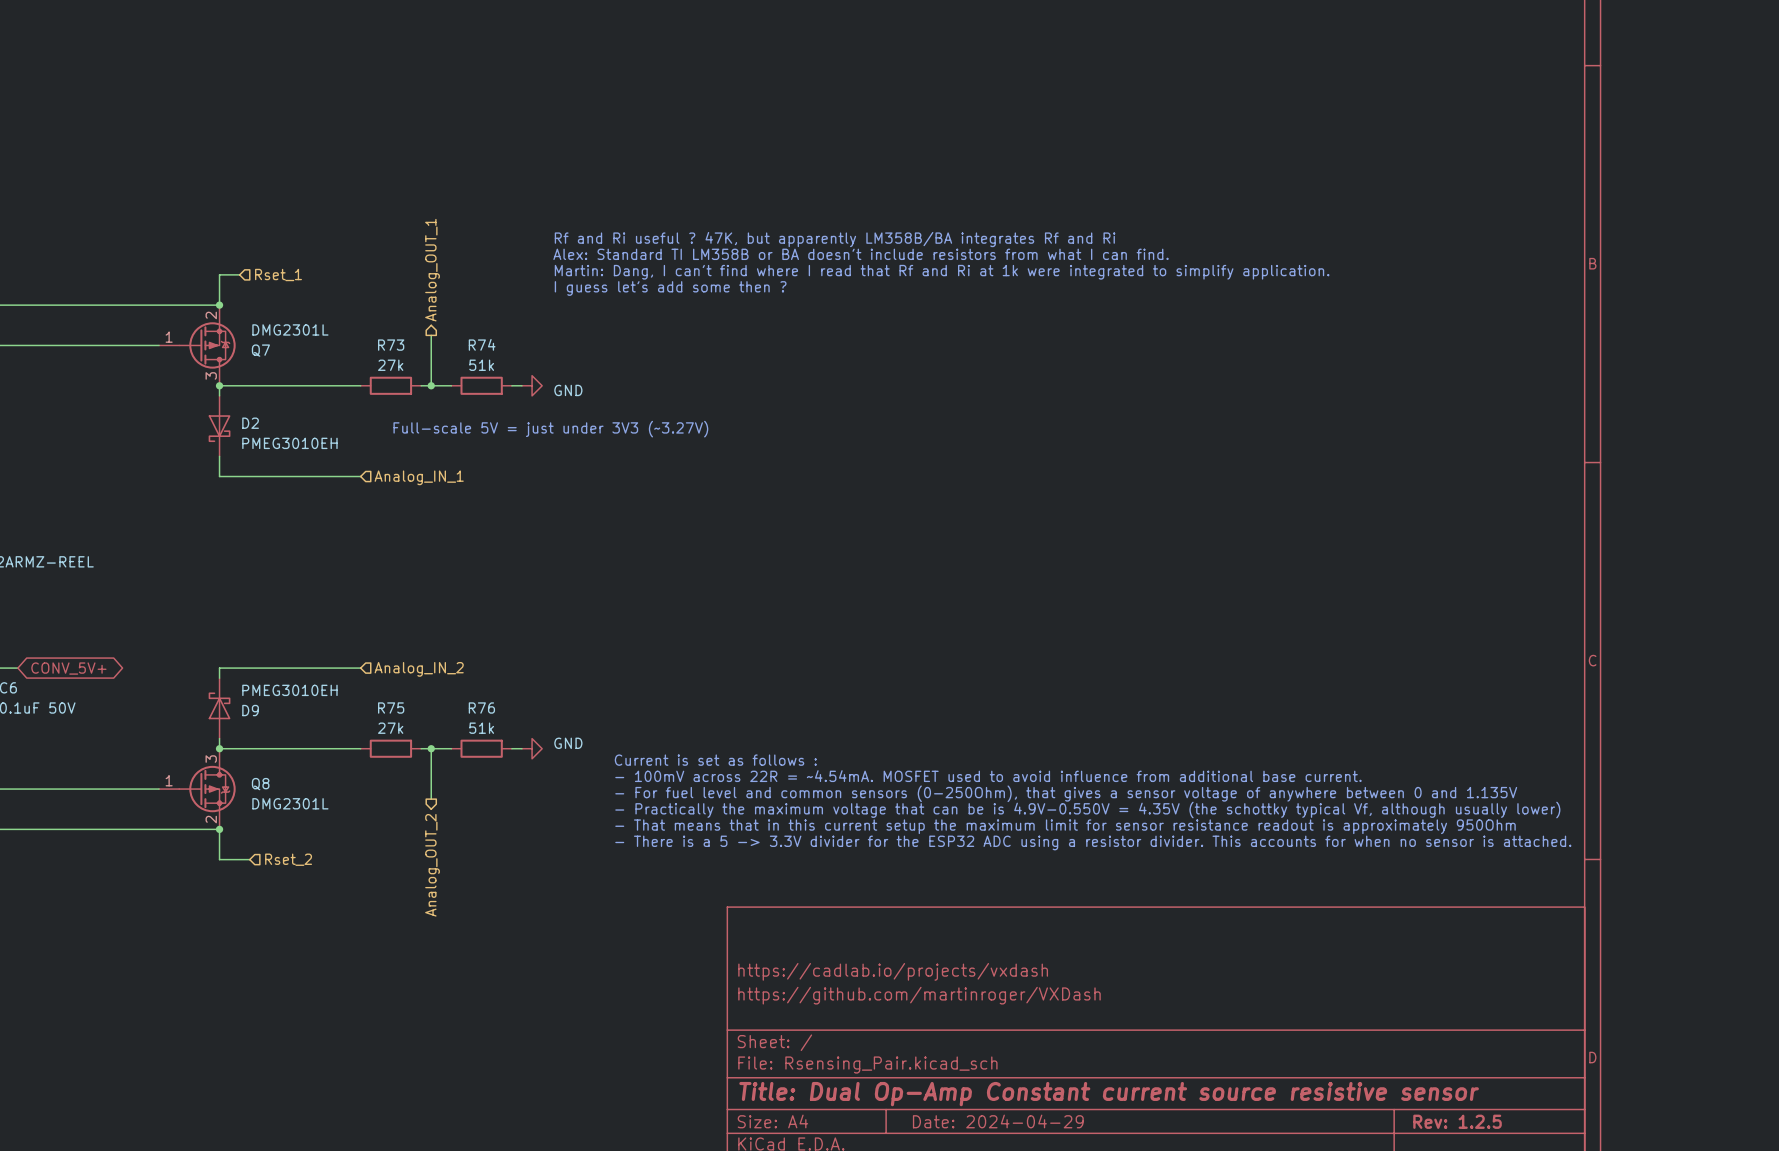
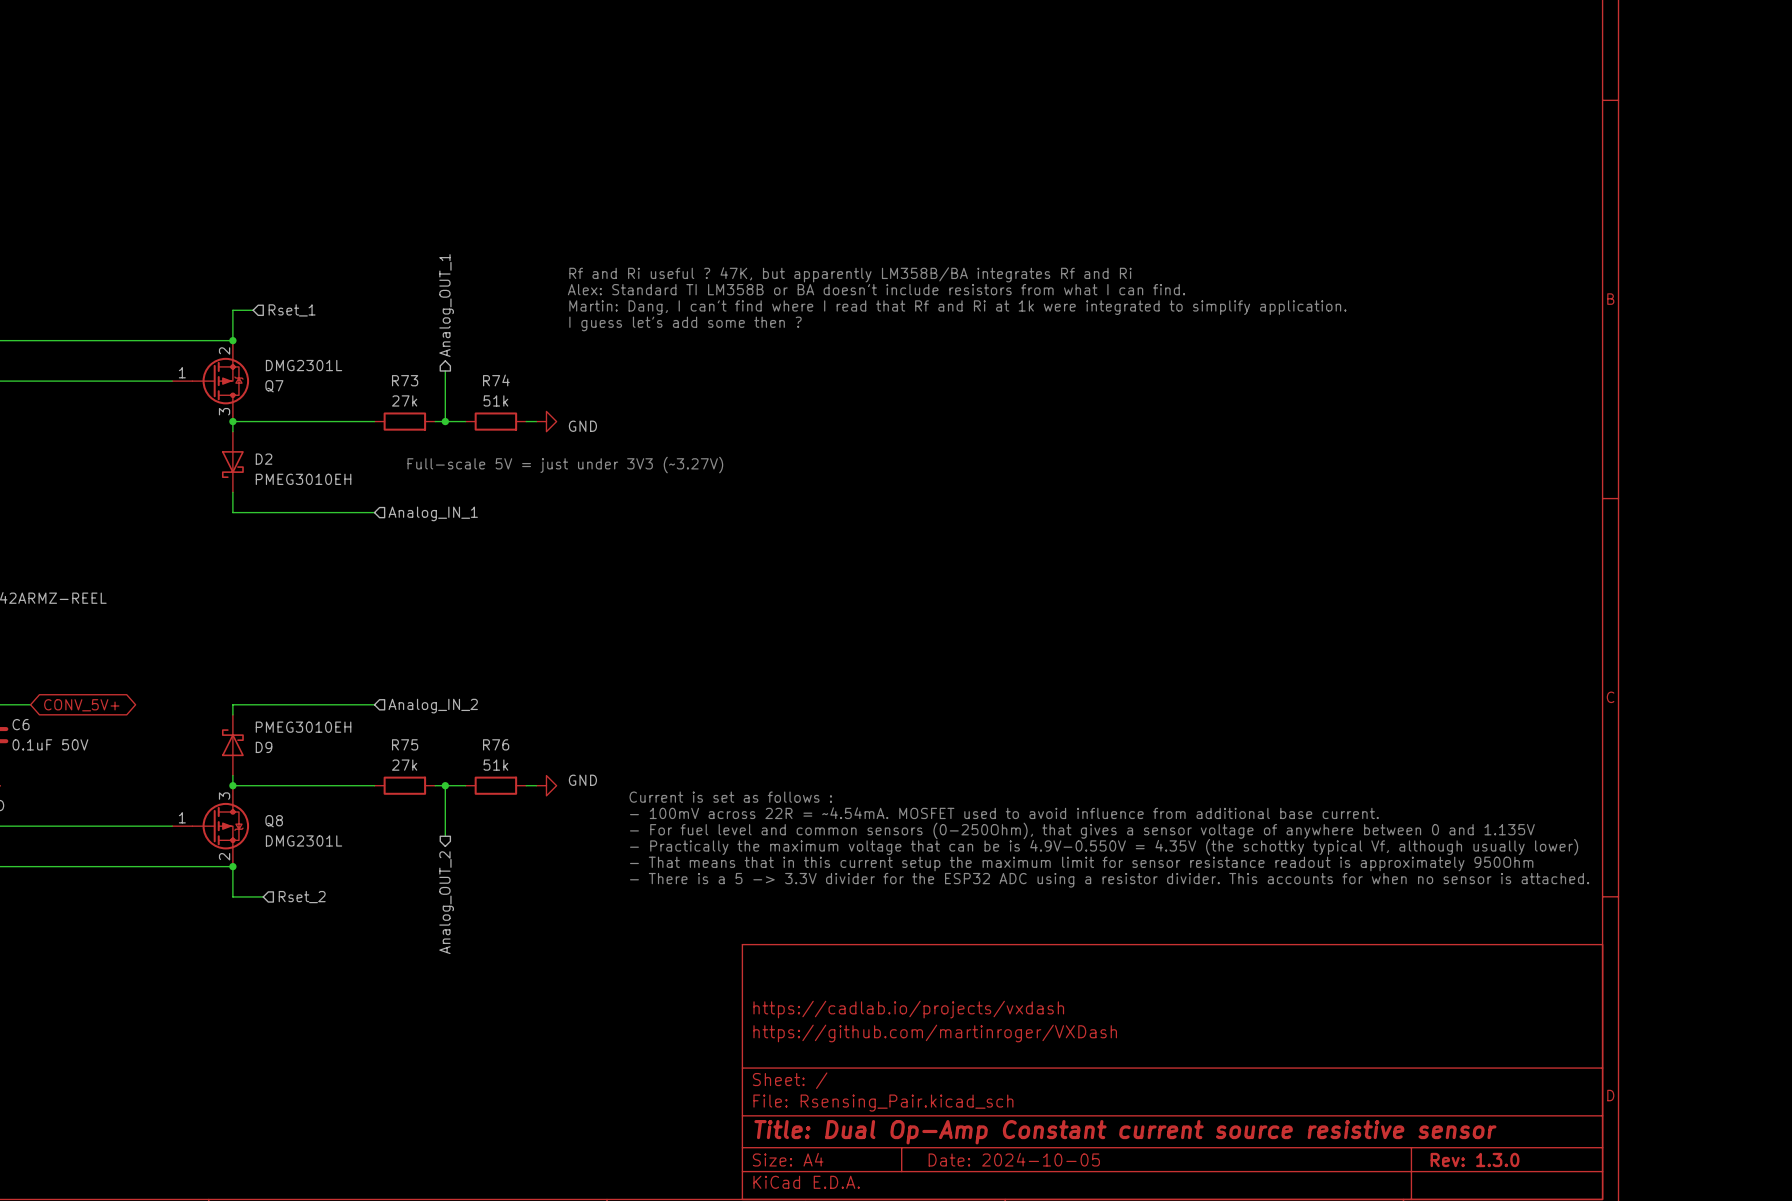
title block: Date: 2024-04-29 (998, 1121) -> Date: 2024-10-05 (1014, 1159)
title block: Rev: 1.2.5 (1457, 1121) -> Rev: 1.3.0 (1475, 1159)

